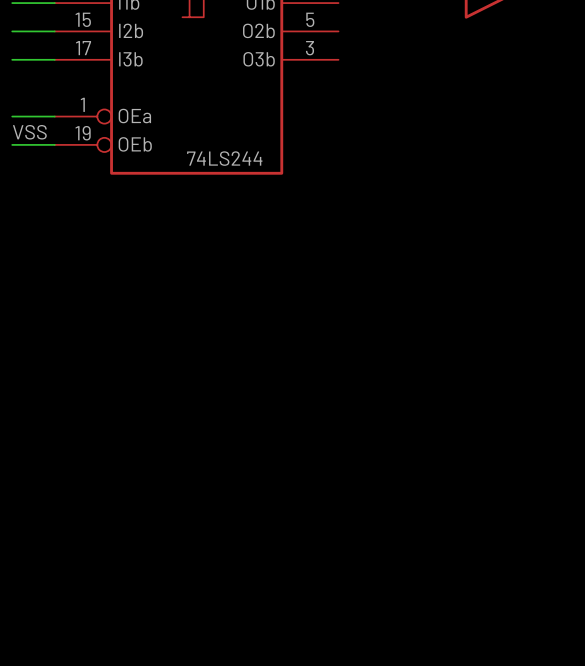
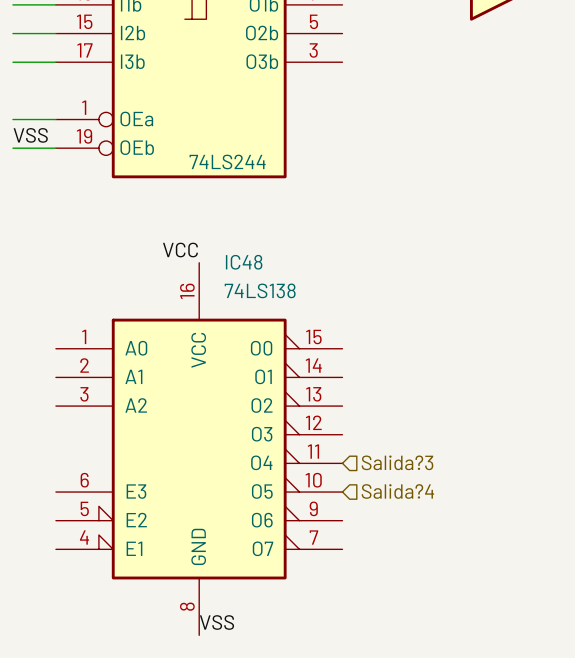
label: none -> VCC (180, 250)
IC48: none -> 74LS138 (199, 449)
hierarchical label: none -> Salida?3 (397, 462)
hierarchical label: none -> Salida?4 (397, 491)
label: none -> VSS (216, 622)

